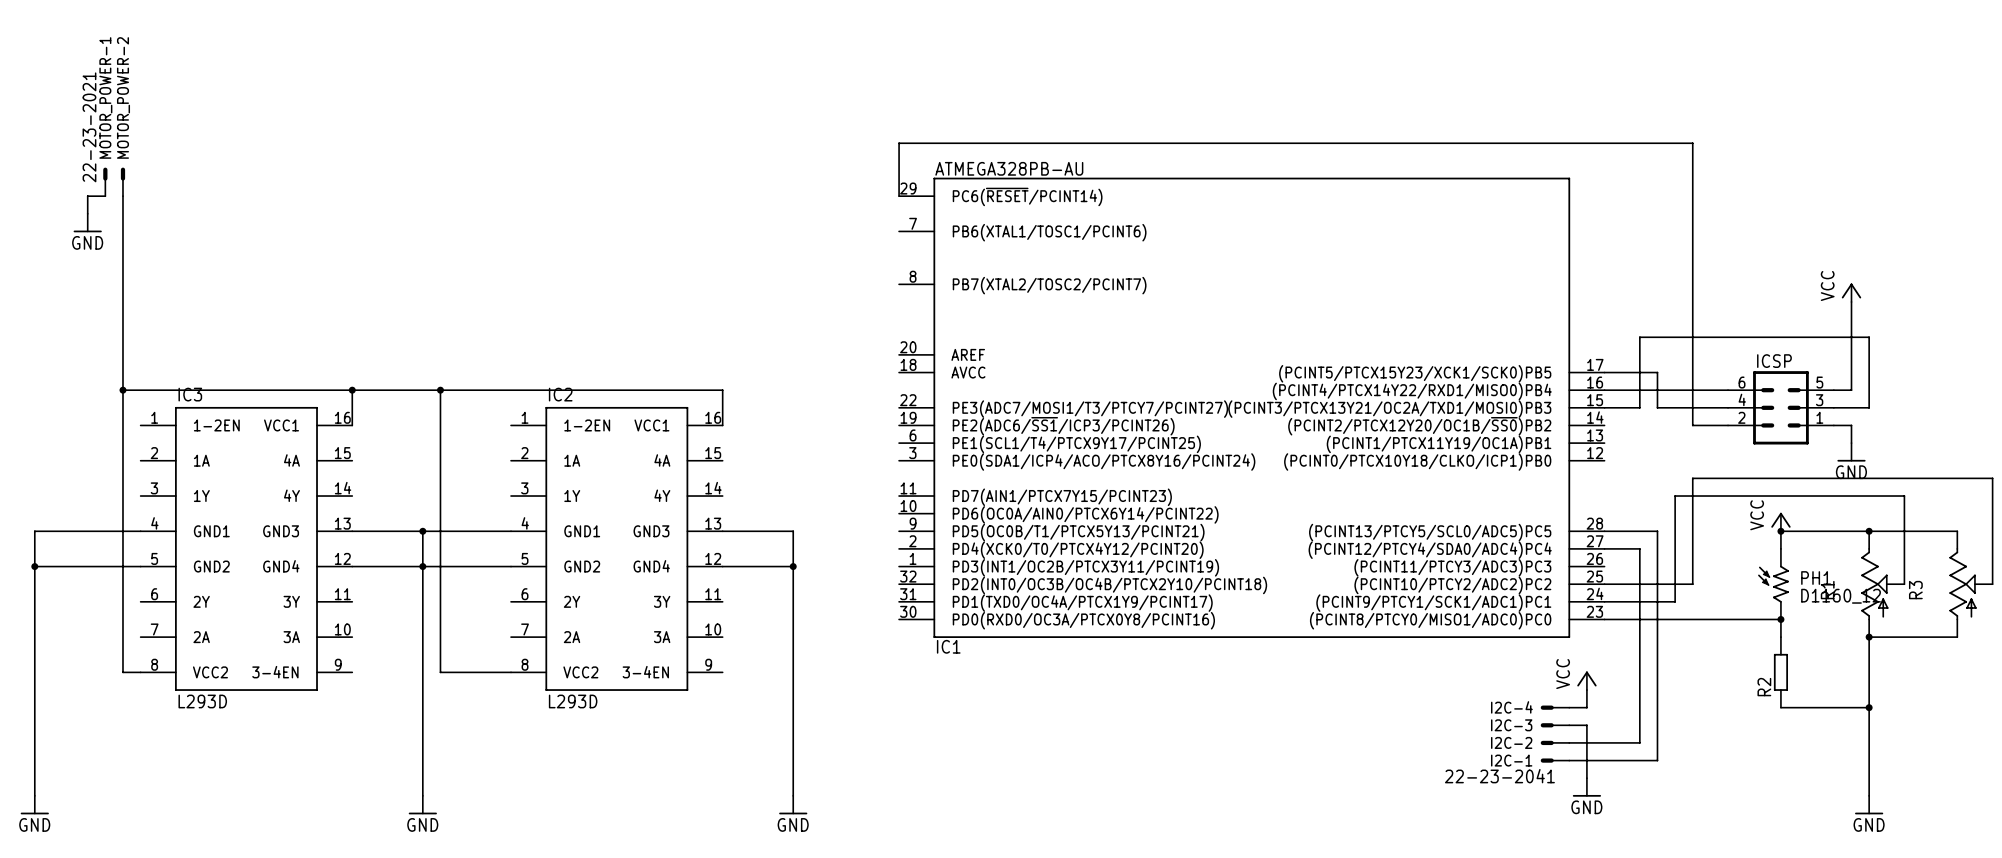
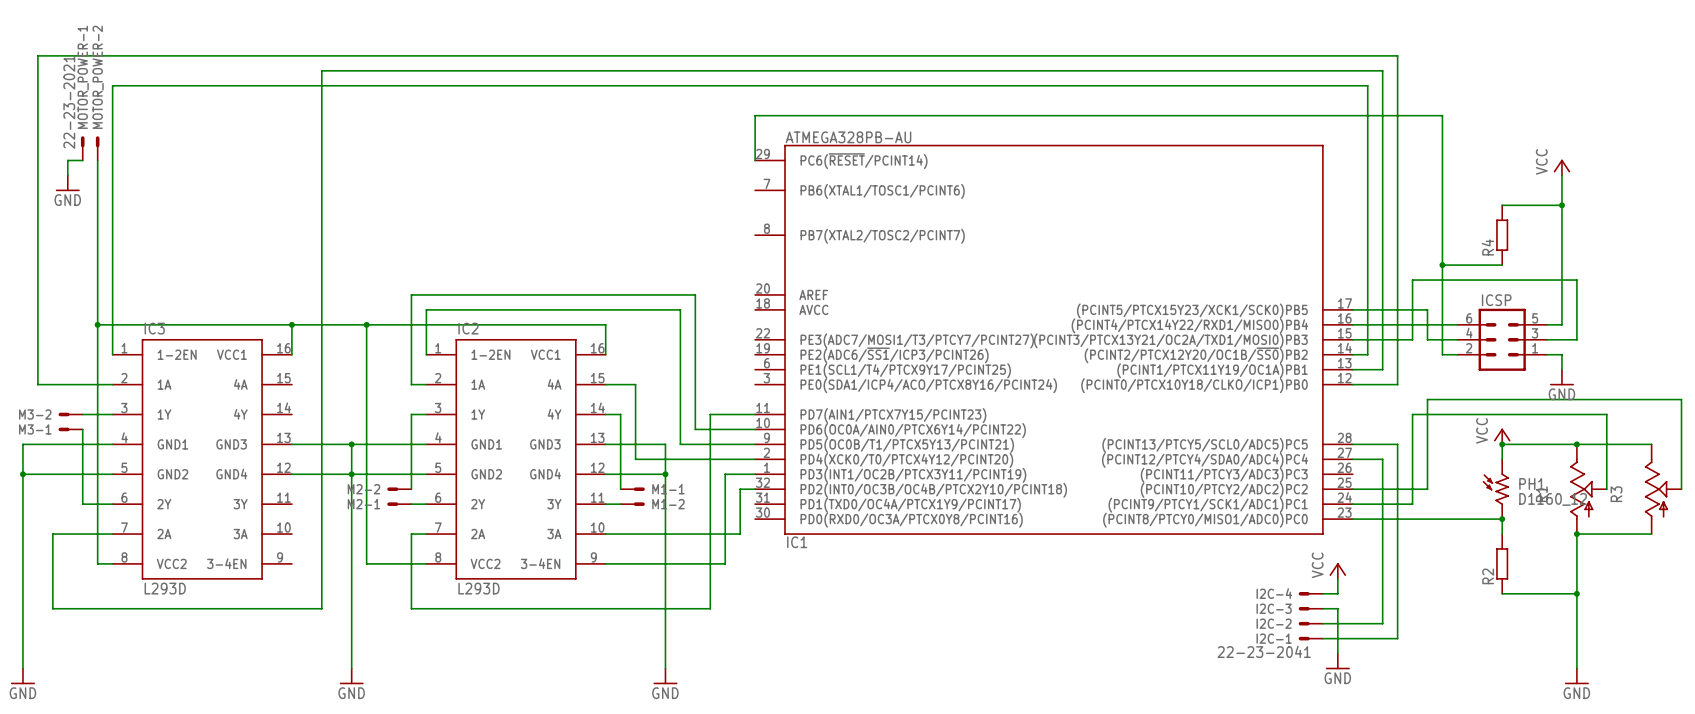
wire: (1692, 143) (1692, 372) -> (1427, 115) (1442, 115) (1442, 354)
wire: none -> (1561, 175) (1561, 250)
wire: none -> (1502, 205) (1561, 205)
junction: none -> (1561, 205)
R4: none -> (1502, 235)
power symbol position: VCC (1851, 292) -> VCC (1561, 167)
wire: none -> (1442, 265) (1502, 265)
junction: none -> (1442, 265)
wire: (1639, 337) (1675, 337) -> (1412, 339) (1412, 280)
wire: none -> (1382, 280) (1382, 70) (321, 70) (321, 608) (52, 608) (52, 534) (112, 534)
wire: none -> (1427, 309) (1397, 309) (1397, 55) (37, 55) (37, 384) (112, 384)
wire: (1675, 407) (1692, 407) (1692, 425) (1710, 425) -> none
wire: none -> (112, 354) (112, 85) (1367, 85) (1367, 354) (1352, 354)
wire: none -> (426, 354) (426, 309) (680, 309) (680, 444) (755, 444)
wire: none -> (1352, 369) (1382, 369) (1382, 339) (1397, 339) (1397, 384) (1352, 384)
wire: none -> (426, 384) (411, 384) (411, 294) (695, 294) (695, 429) (755, 429)
wire: none -> (605, 384) (635, 384) (635, 459) (755, 459)
M3-2: none -> (70, 414)
wire: none -> (82, 414) (112, 414)
wire: none -> (426, 414) (411, 414) (411, 489)
wire: none -> (605, 414) (620, 414) (620, 489)
wire: none -> (755, 414) (710, 414) (710, 608) (411, 608) (411, 534) (426, 534)
M3-1: none -> (70, 429)
wire: none -> (82, 429) (82, 504) (112, 504)
wire: none -> (755, 474) (725, 474) (725, 563) (605, 563)
M2-2: none -> (399, 489)
M1-1: none -> (632, 489)
wire: none -> (755, 489) (740, 489) (740, 534) (605, 534)
M2-1: none -> (399, 504)
wire: none -> (411, 504) (426, 504)
wire: none -> (605, 504) (620, 504)
M1-2: none -> (632, 504)

